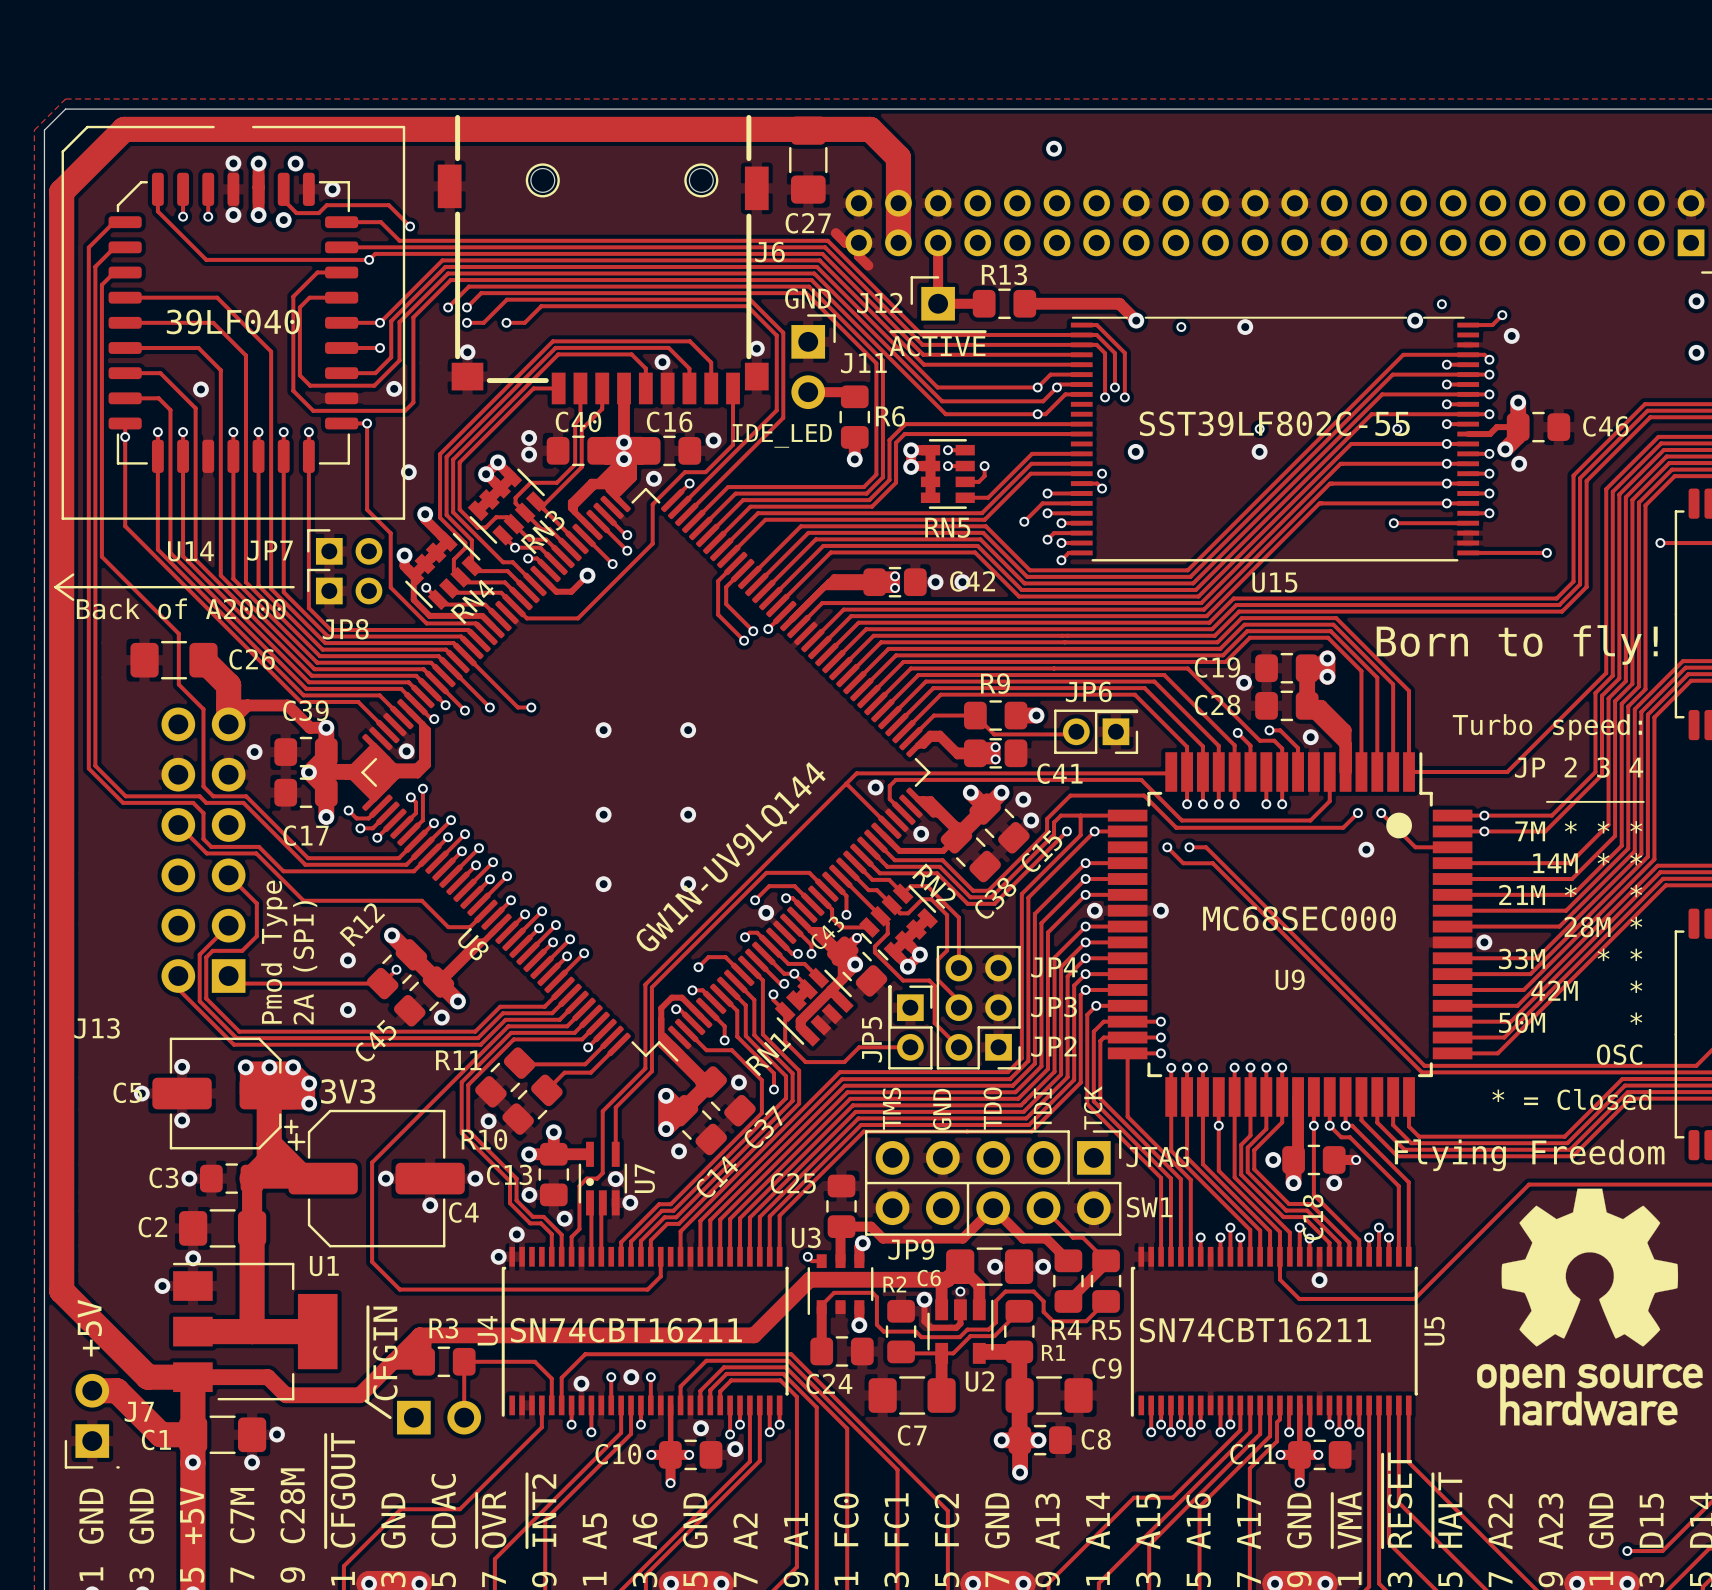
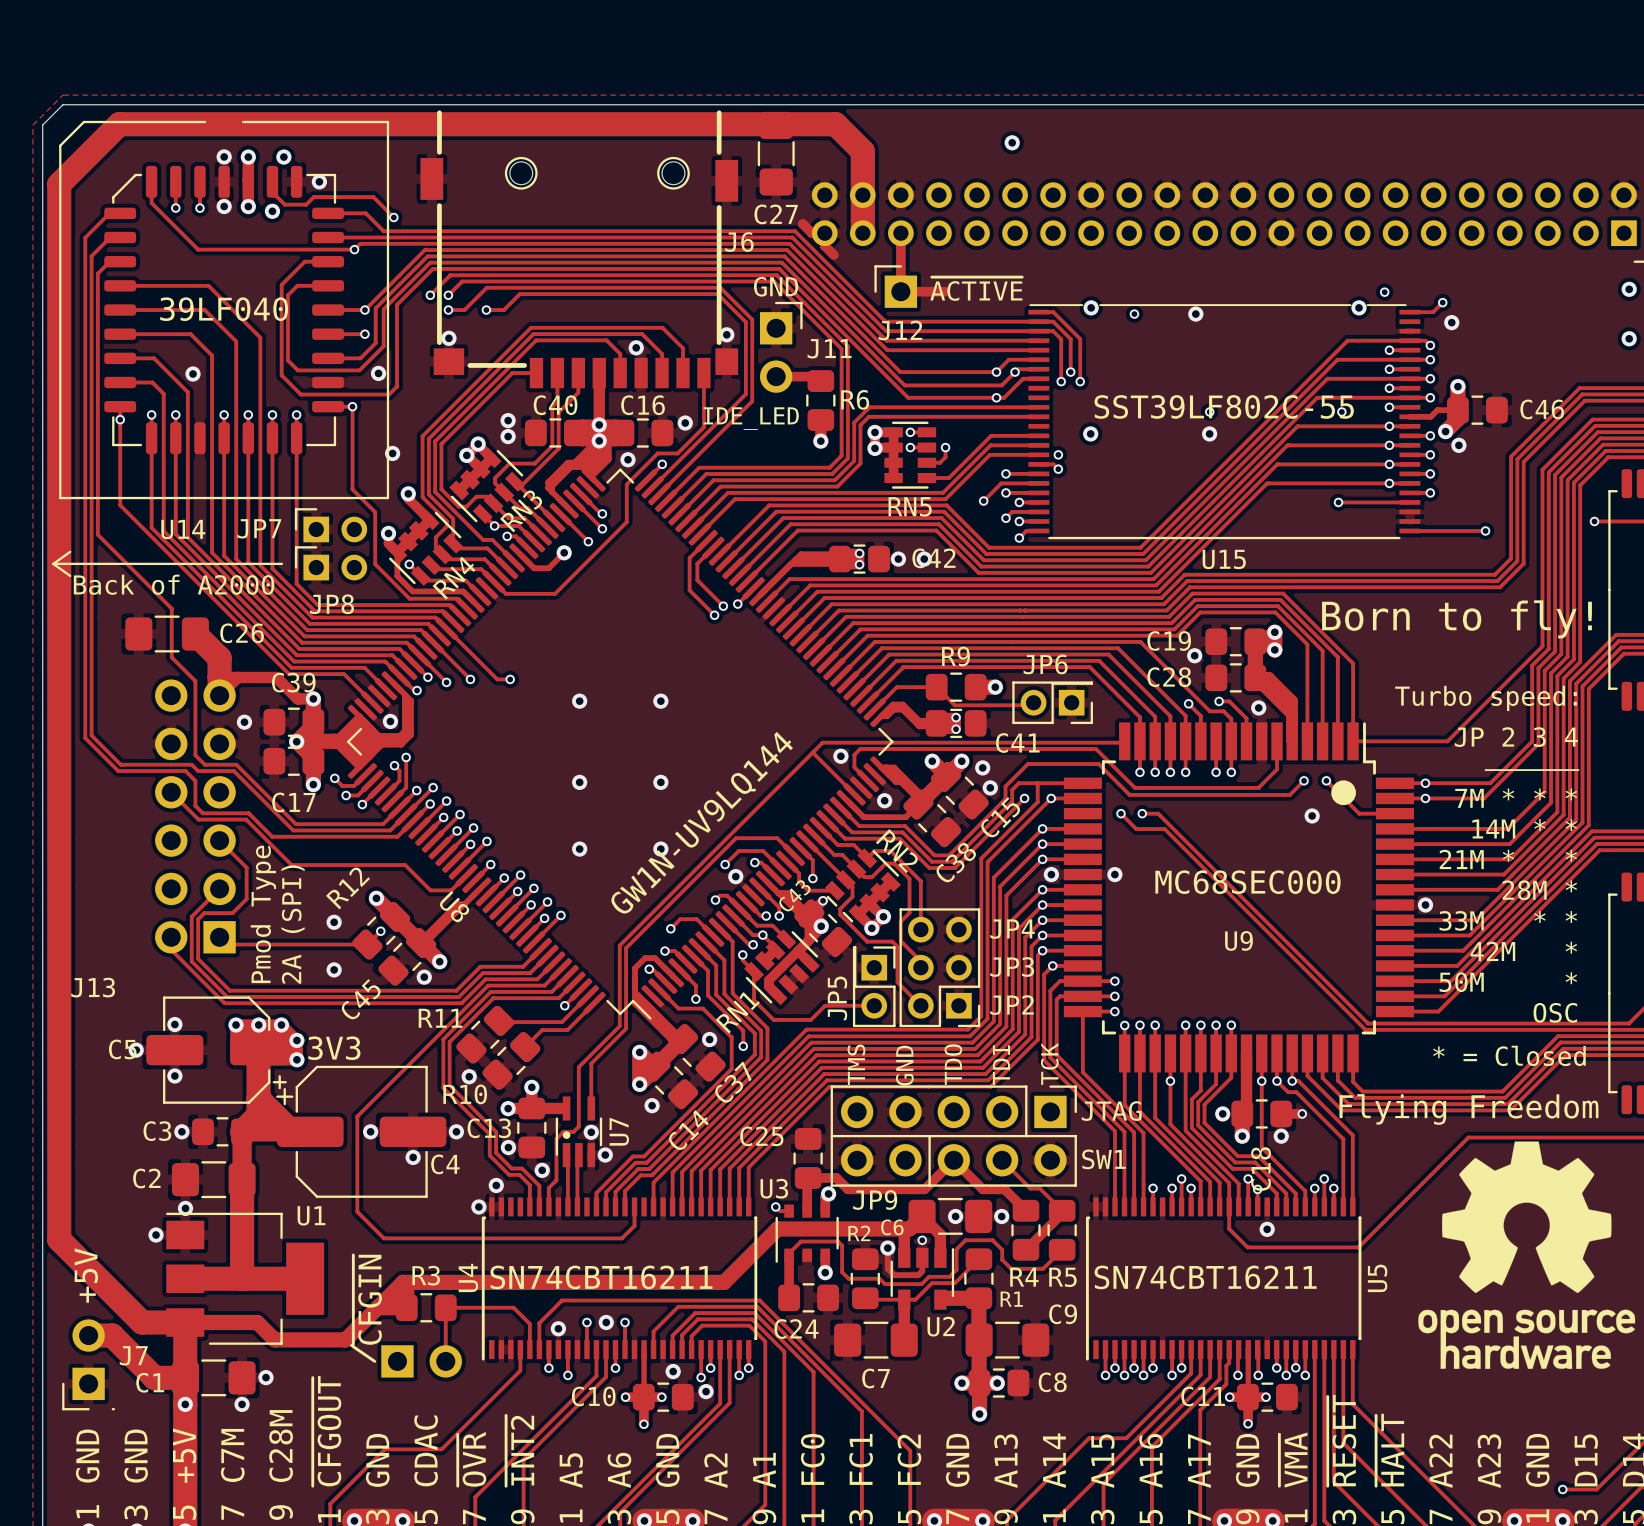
J12 name position: J12 (879, 303) -> J12 (900, 330)
R13: (1004, 303) -> none
track: (1024, 303) (1119, 303) (1136, 320) -> none
text position: ~{ACTIVE} (937, 344) -> ~{ACTIVE} (976, 288)

